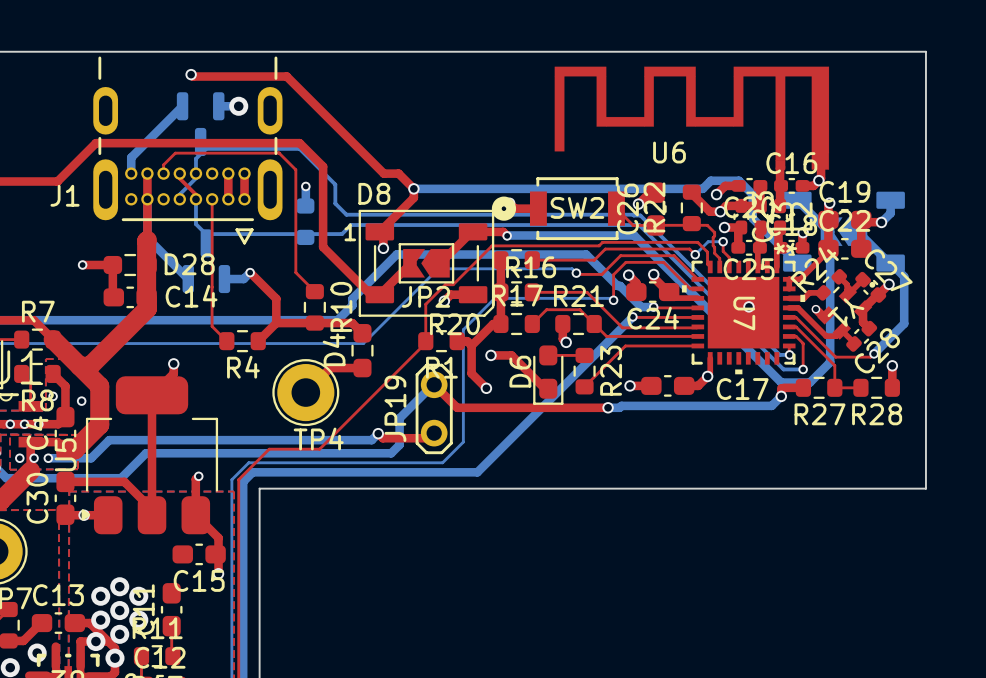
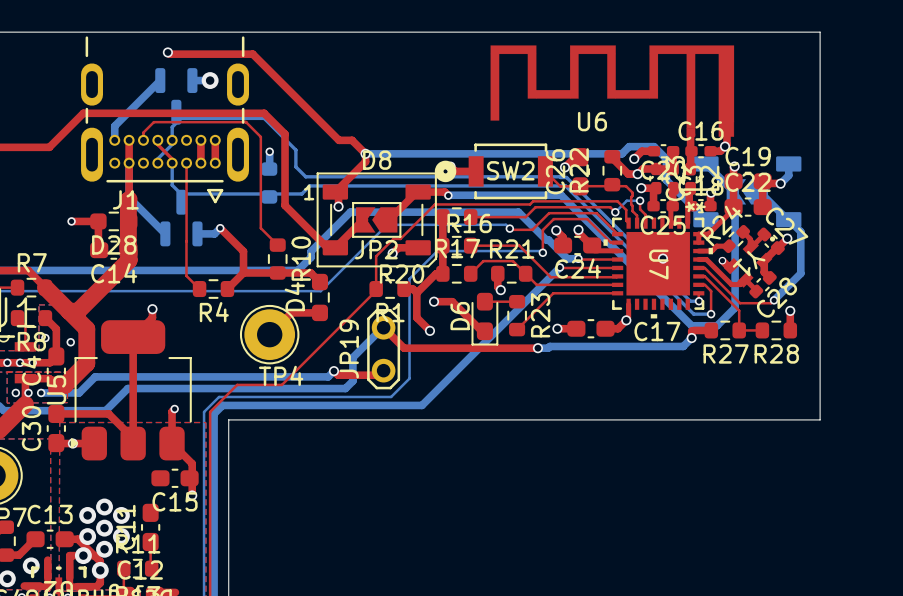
D8 name position: D8 (374, 193) -> D8 (377, 160)
J1 name position: J1 (65, 195) -> J1 (125, 199)
D28 name position: D28 (189, 264) -> D28 (114, 244)
C14 name position: C14 (191, 296) -> C14 (114, 273)

